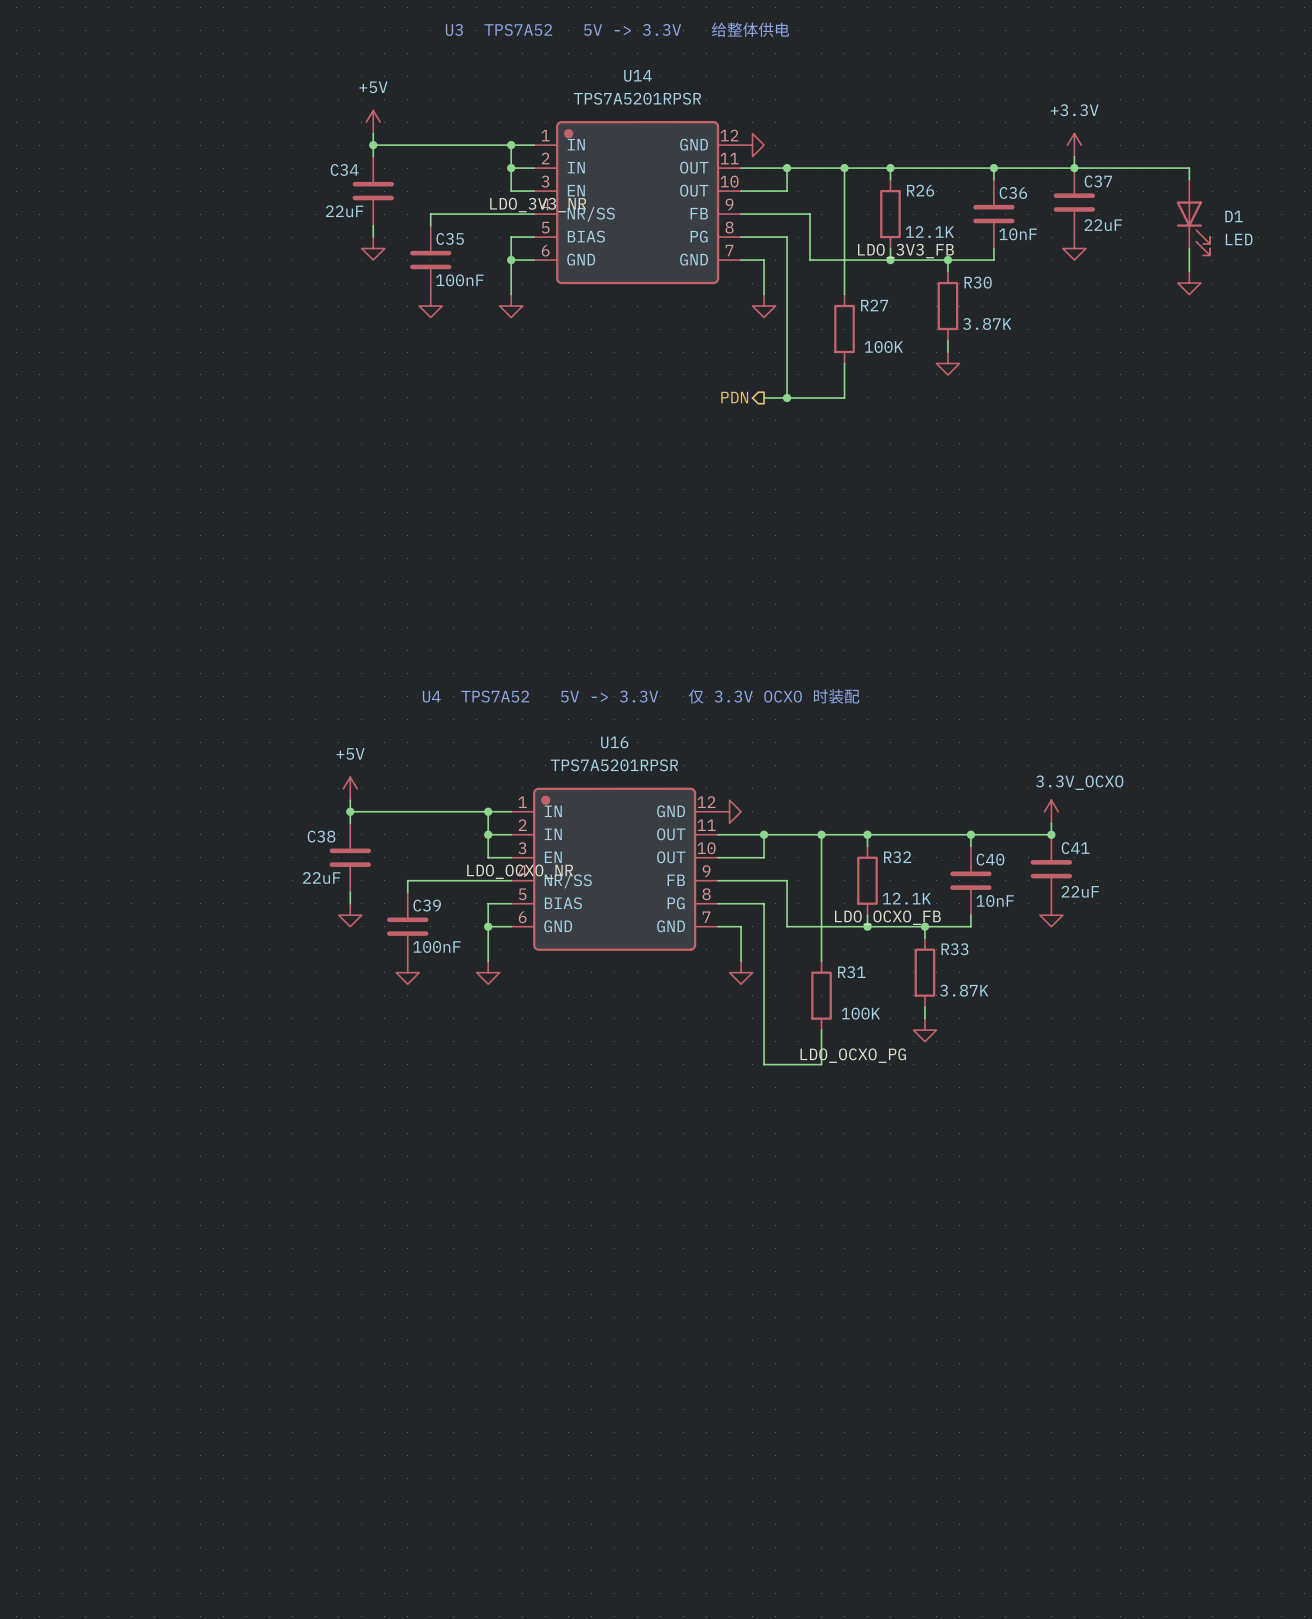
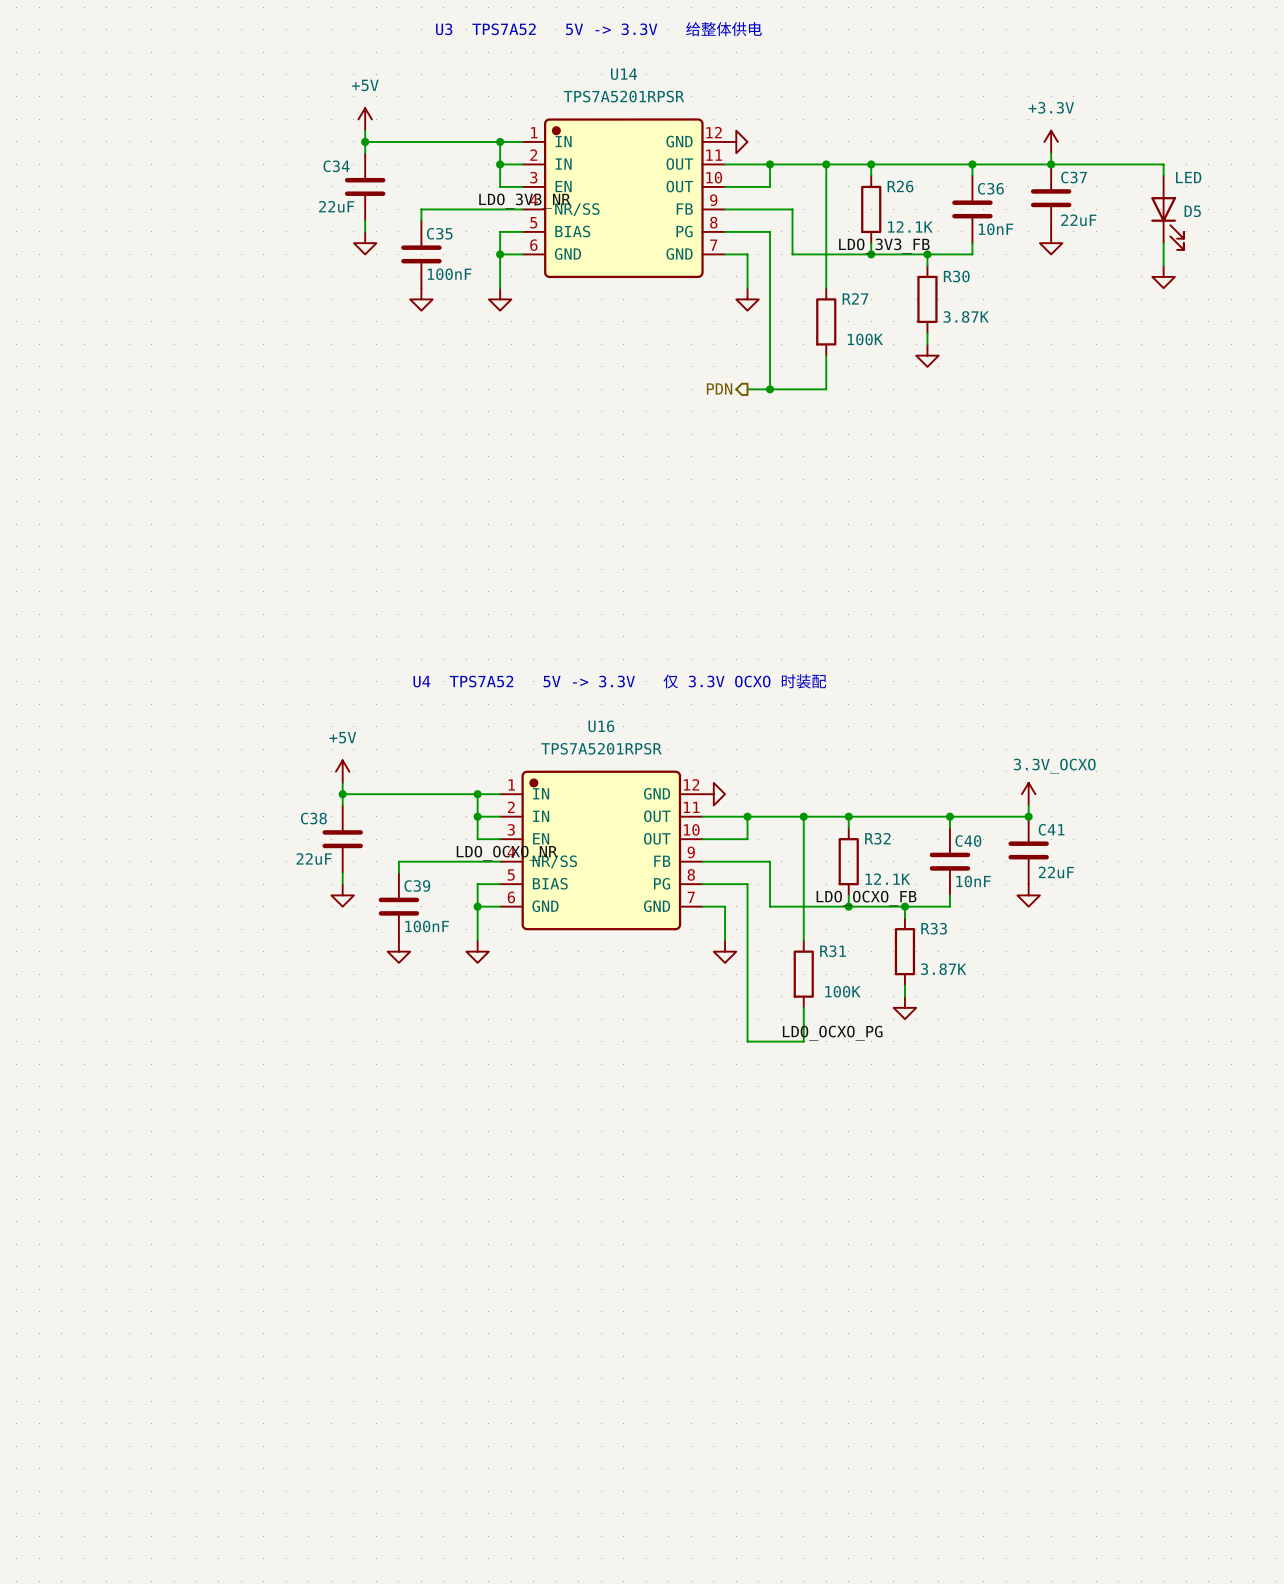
D1 name: D1 (1234, 216) -> D5 (1192, 211)
D1 value position: LED (1239, 239) -> LED (1188, 177)

